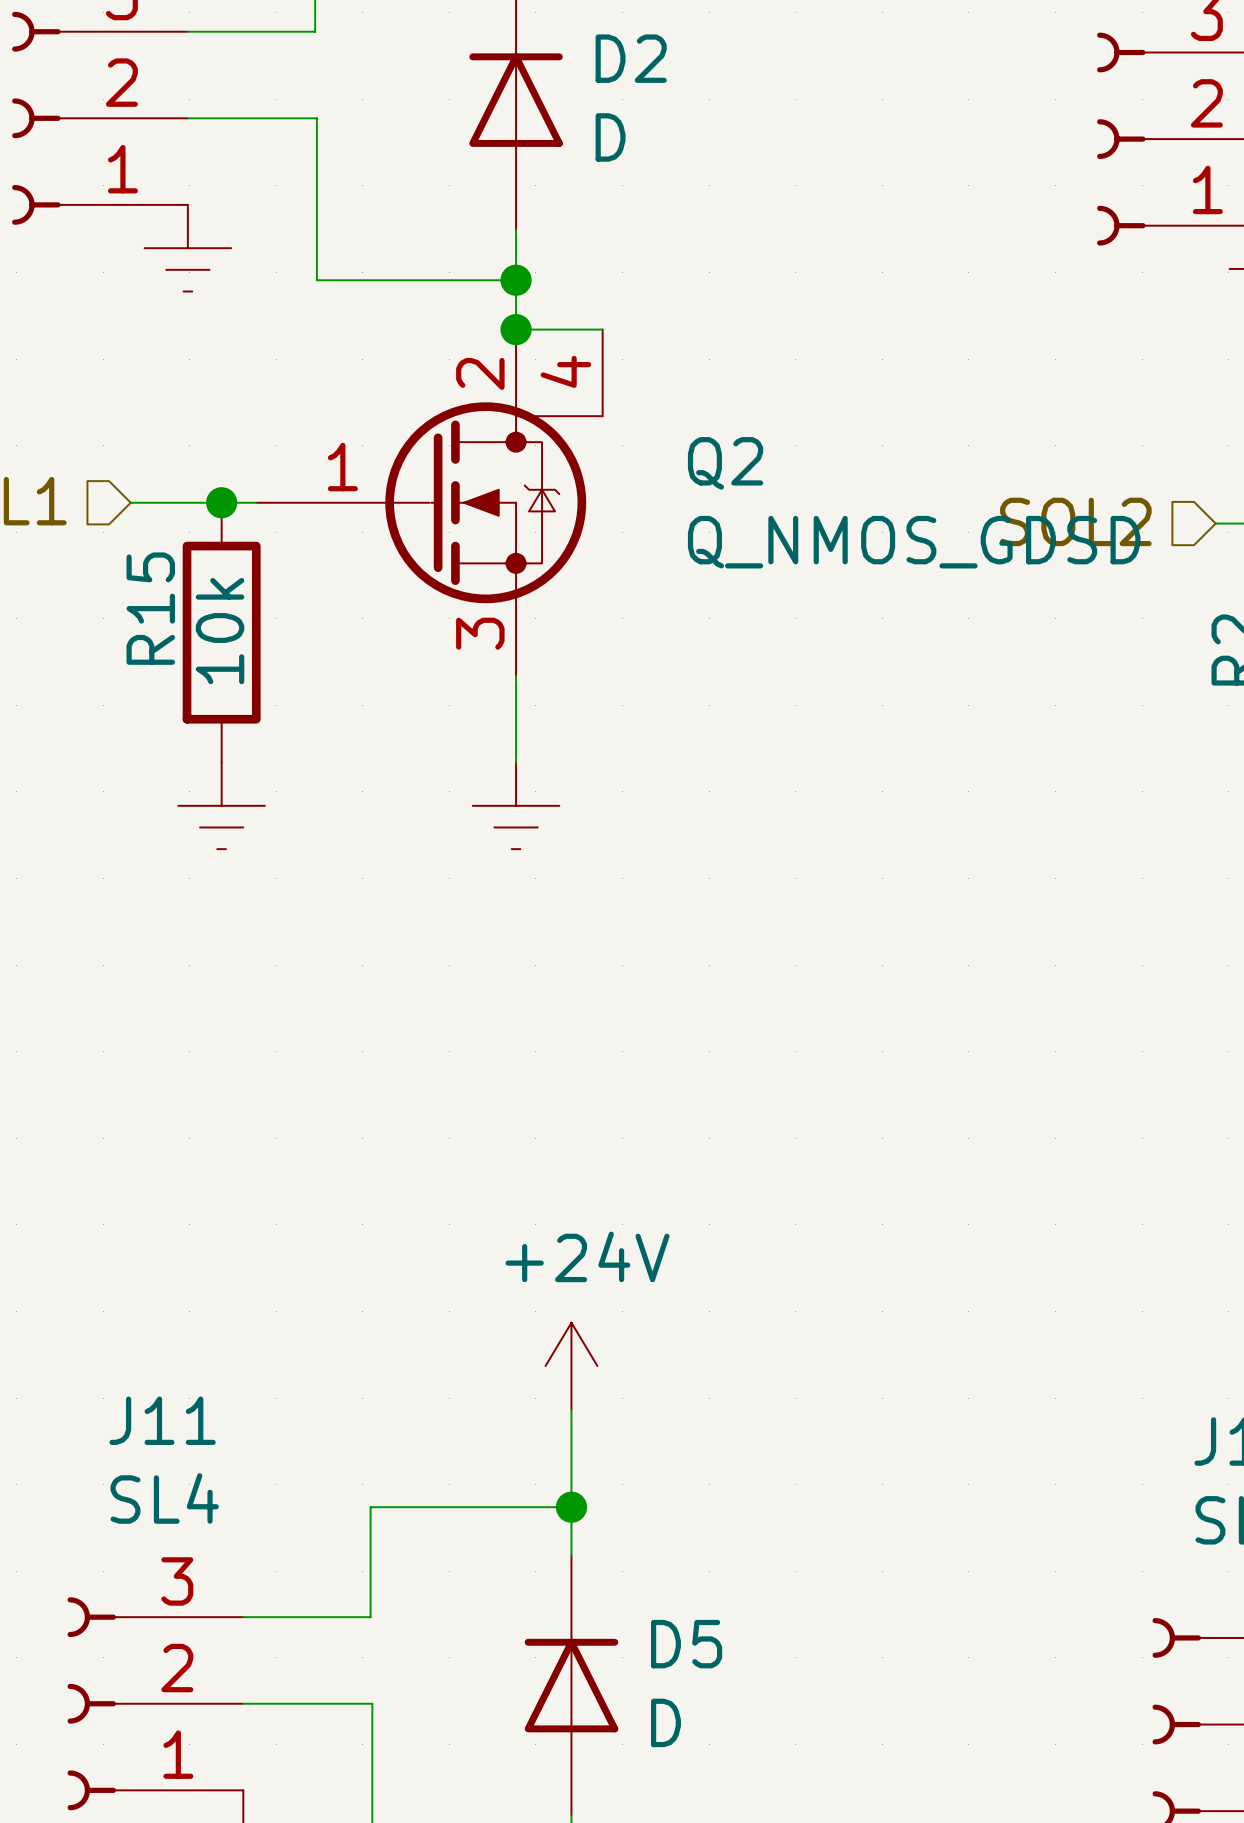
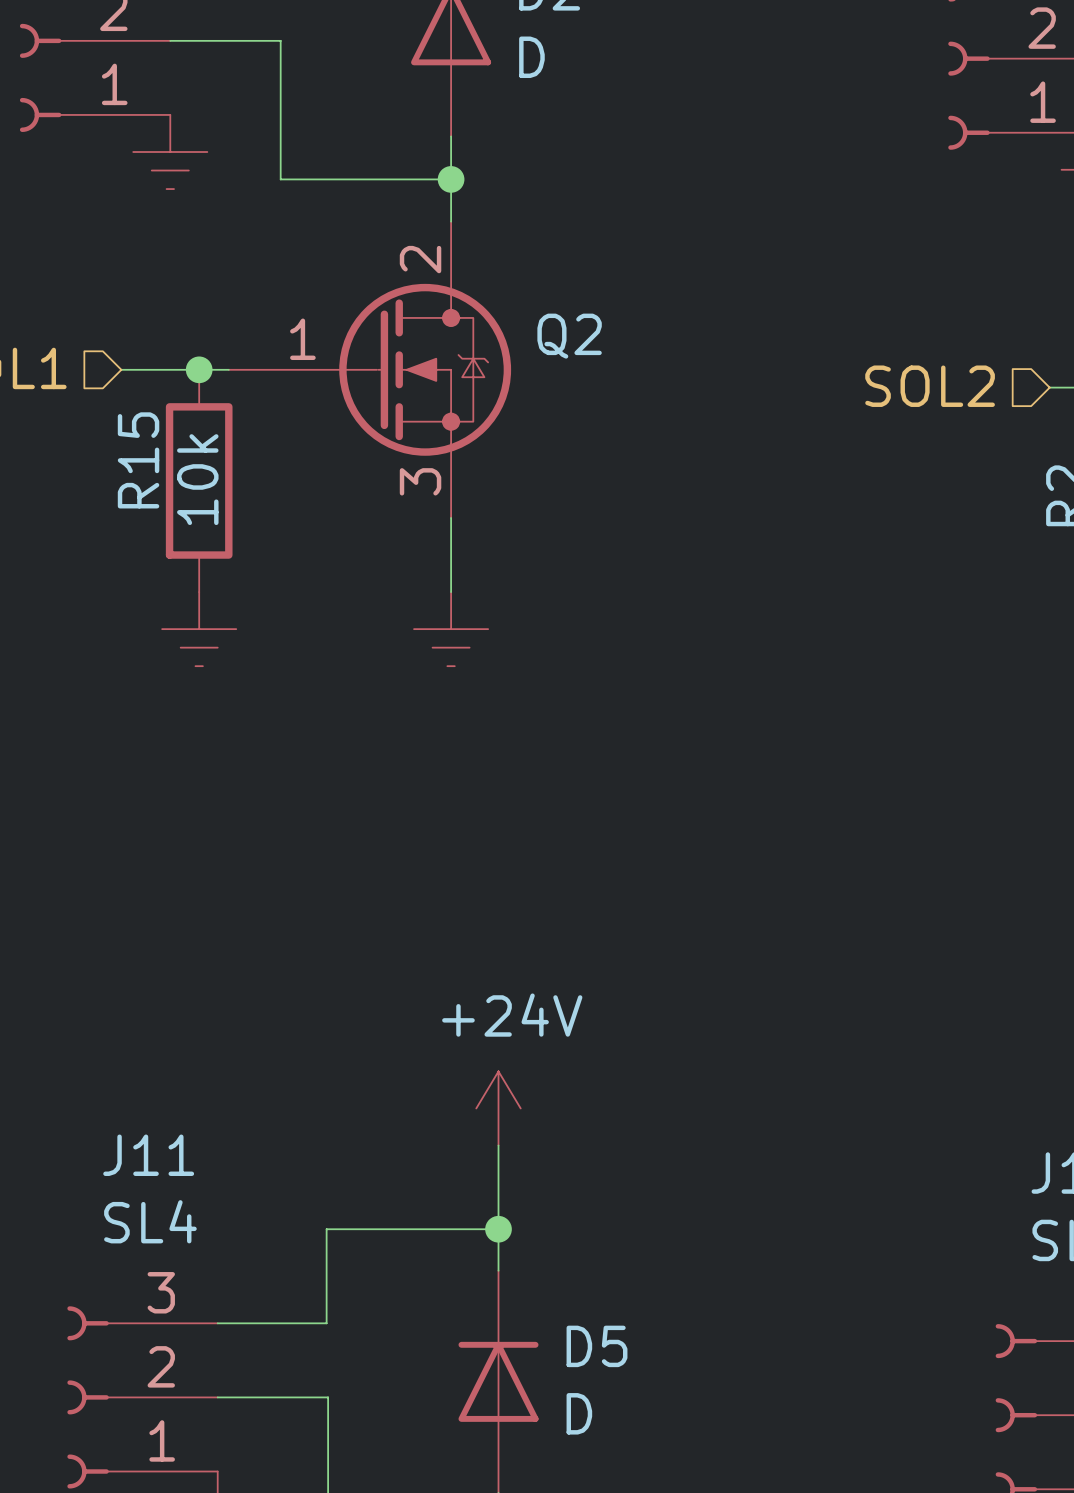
Q2 symbol: [256, 329, 603, 676] -> [228, 221, 512, 518]
wire: (516, 329) (602, 329) -> none
junction: (516, 329) -> none
Q2 value: Q_NMOS_GDSD (914, 542) -> none

